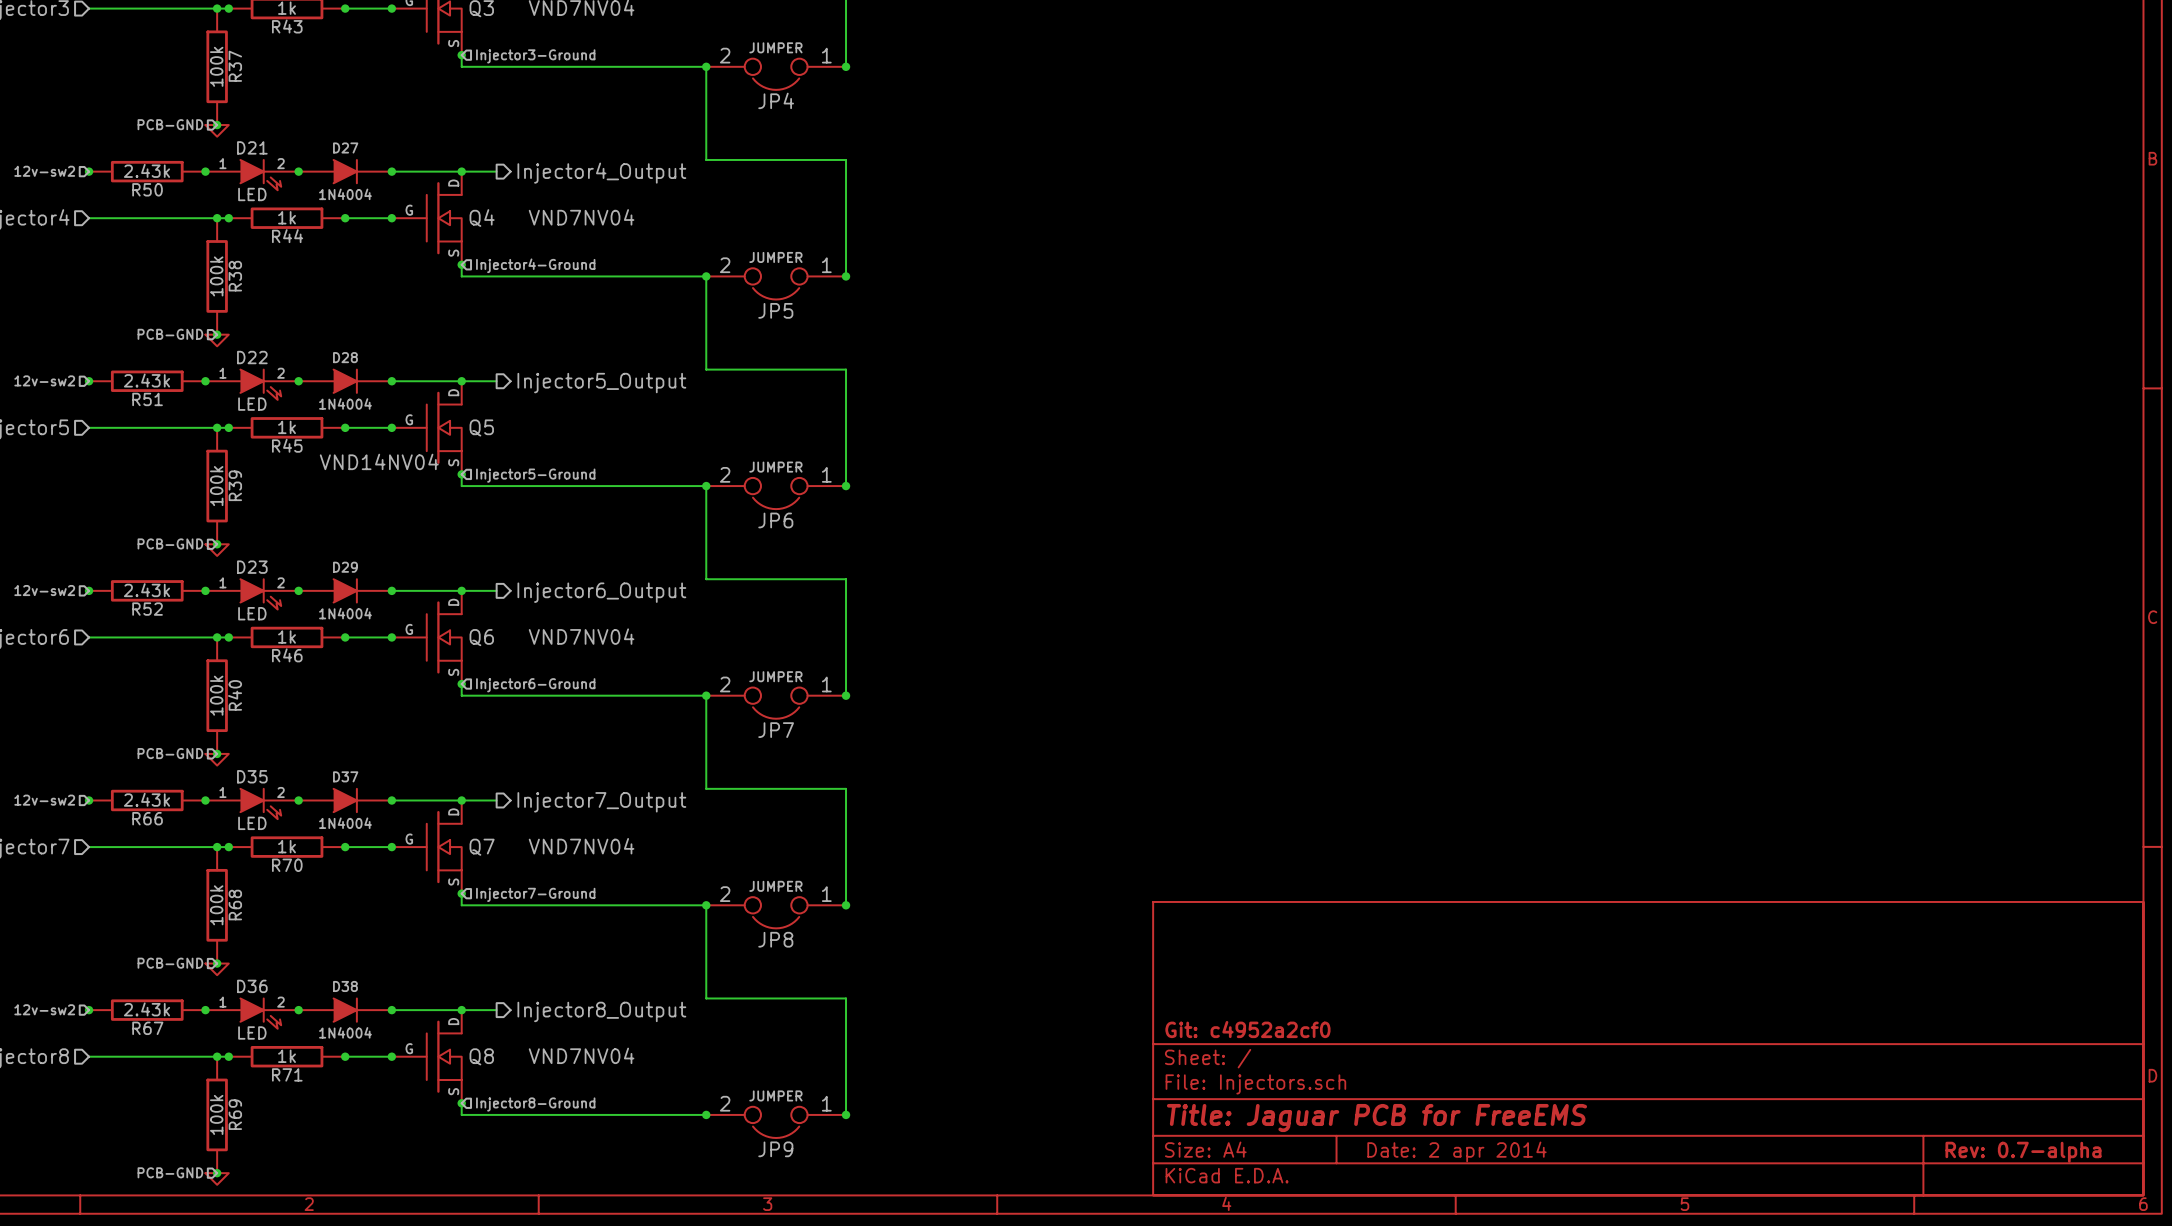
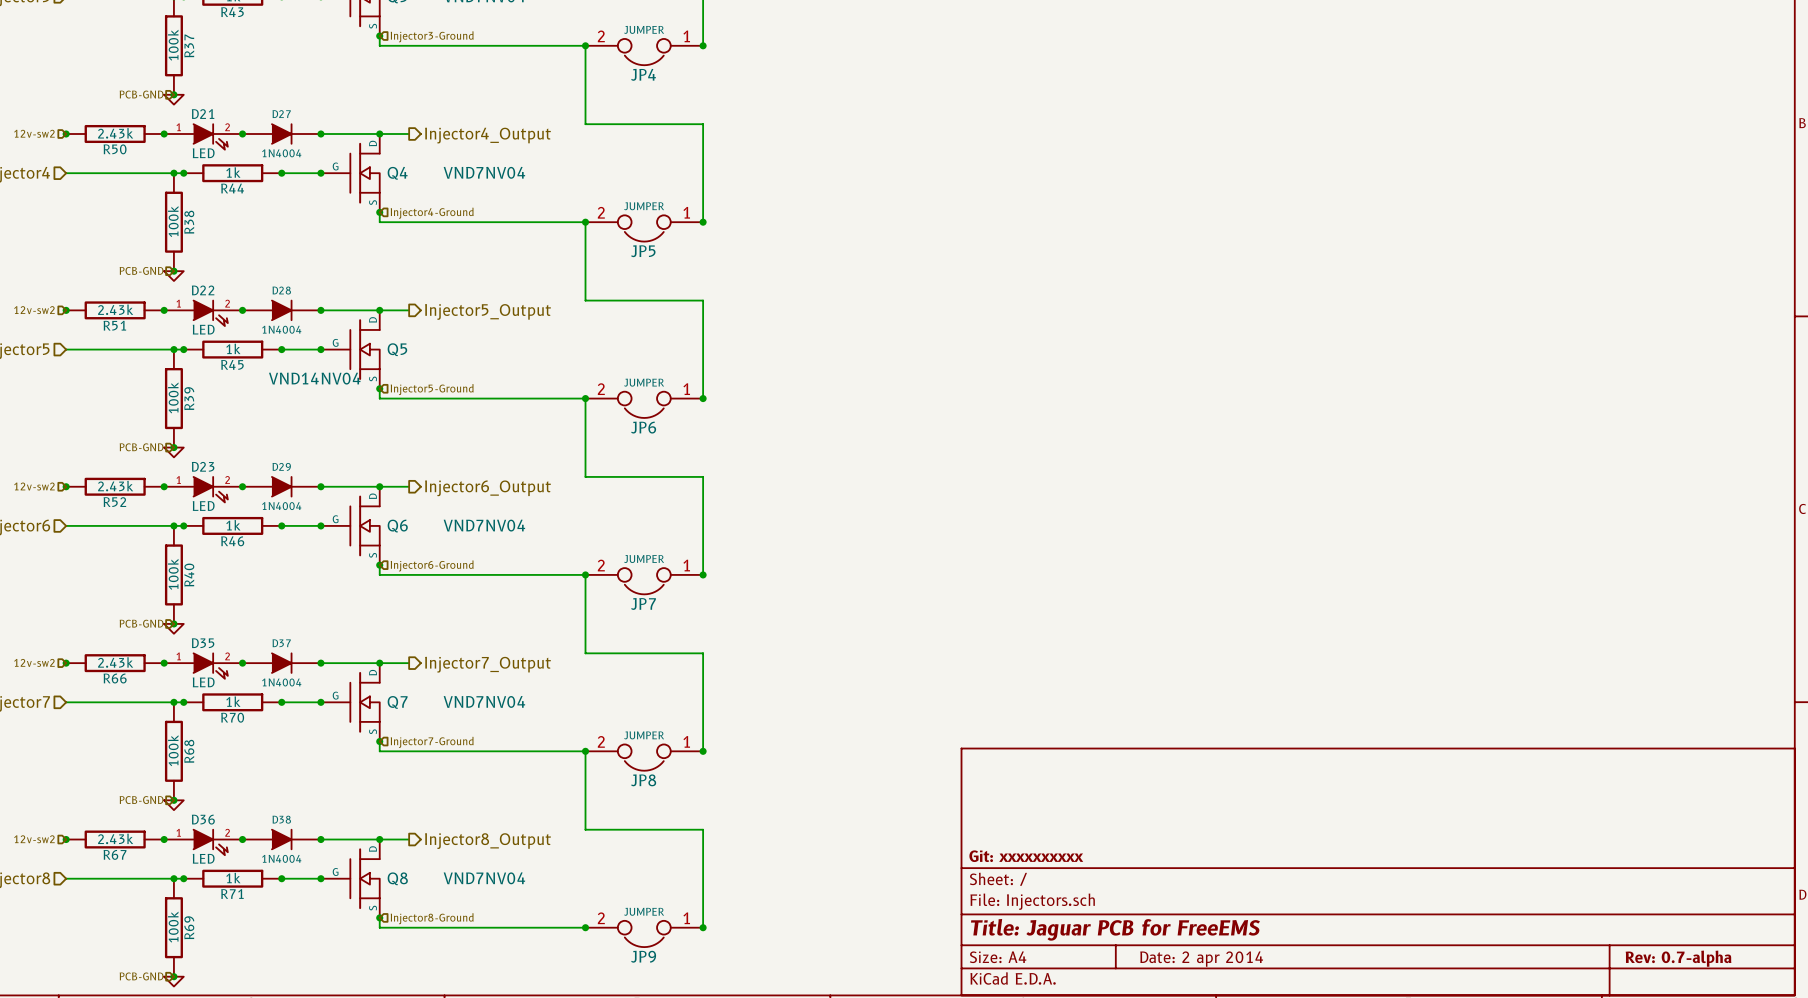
title block: Git: c4952a2cf0 (1247, 1029) -> Git: xxxxxxxxxx (1026, 856)

